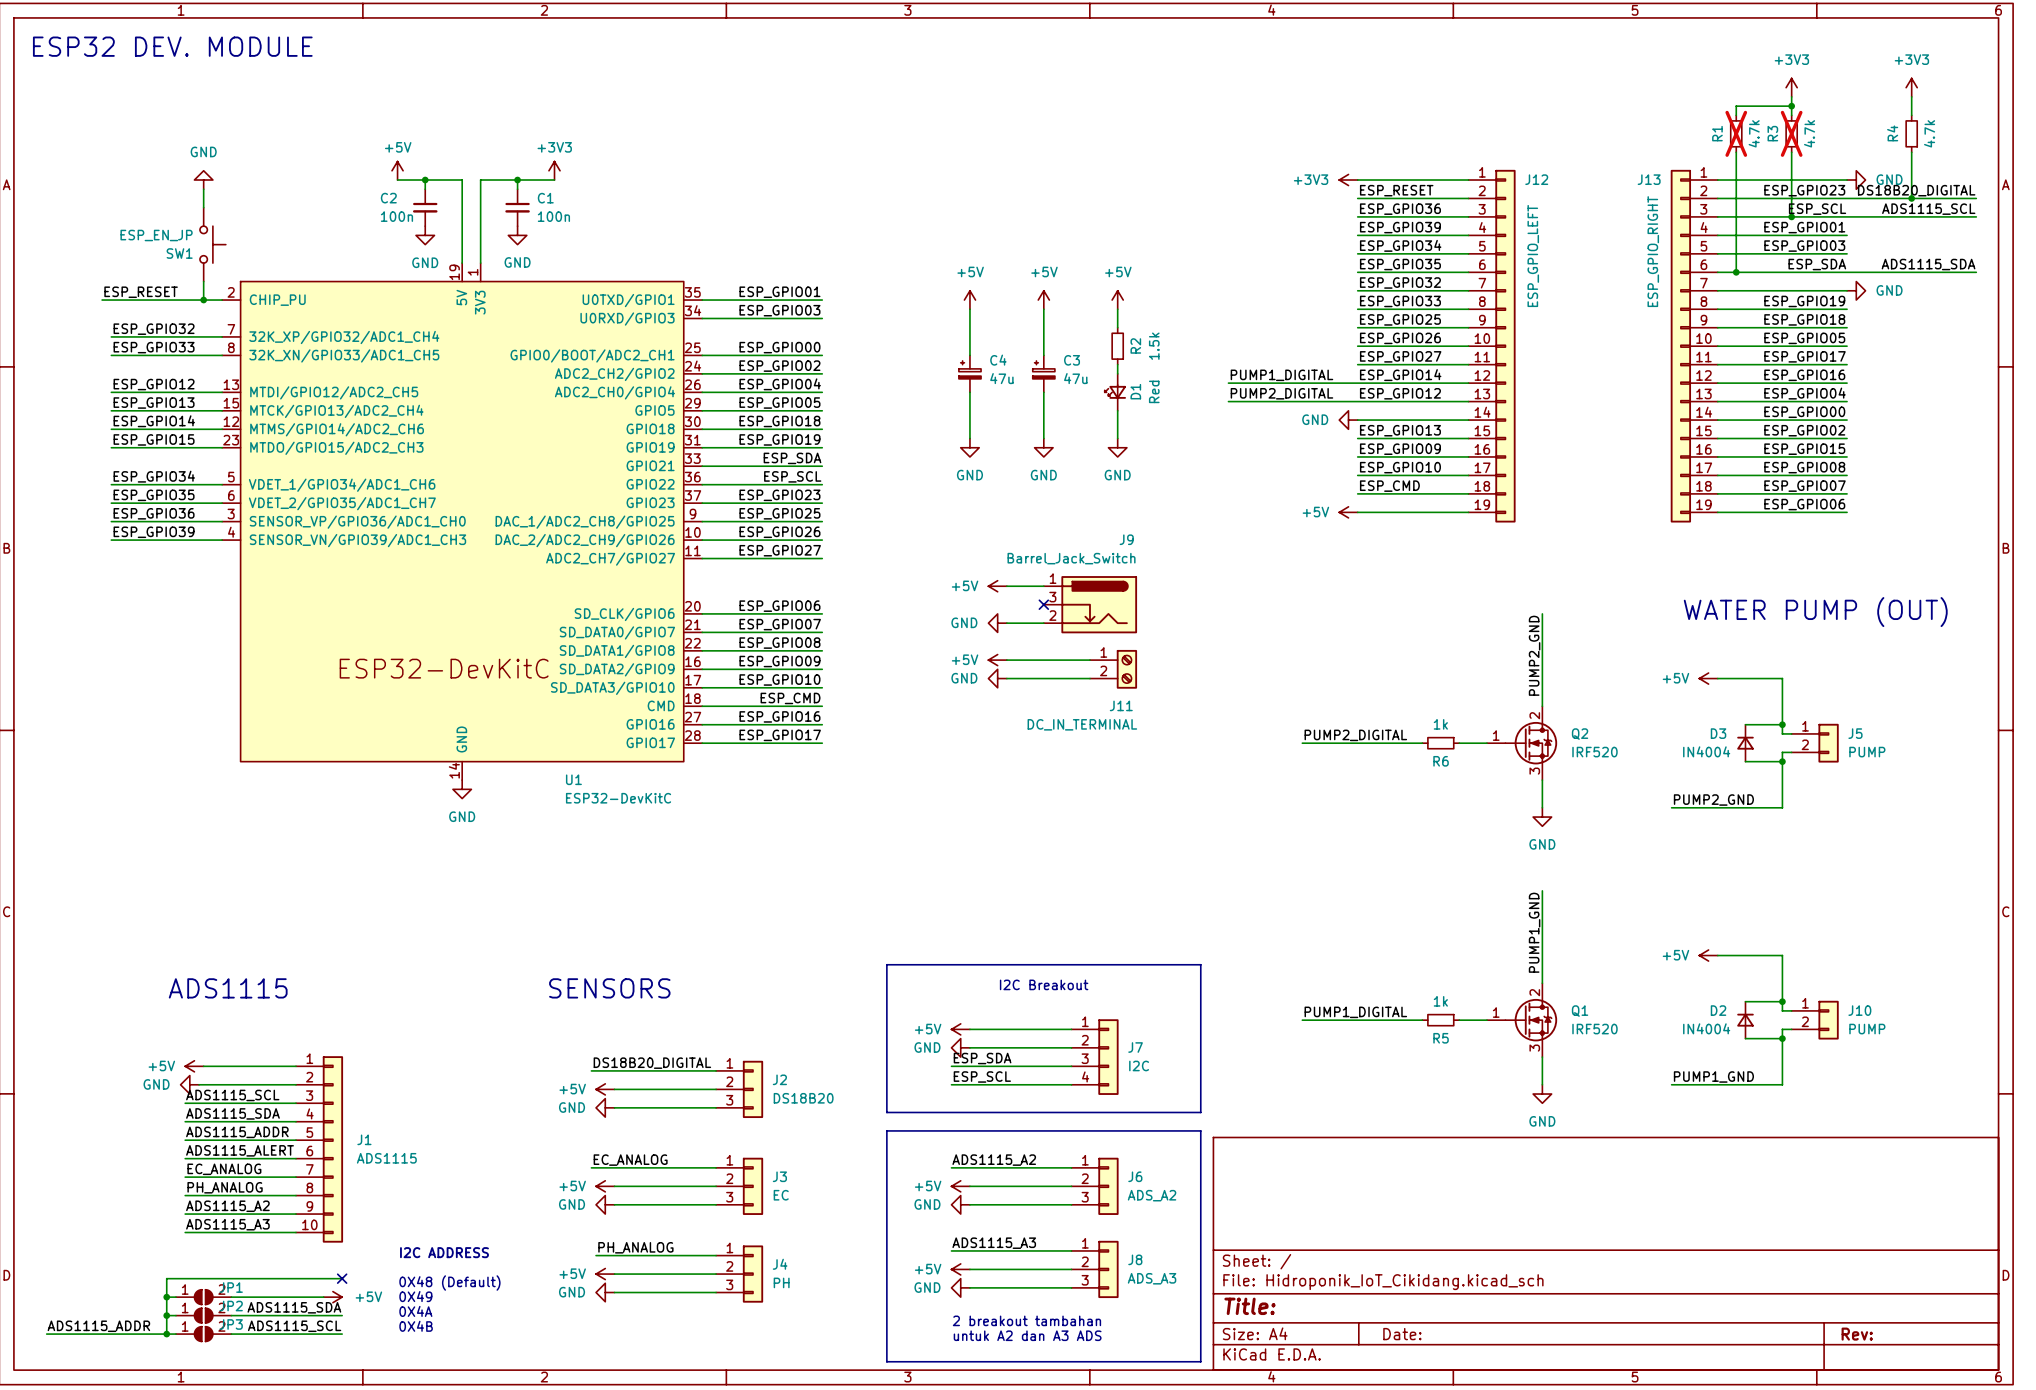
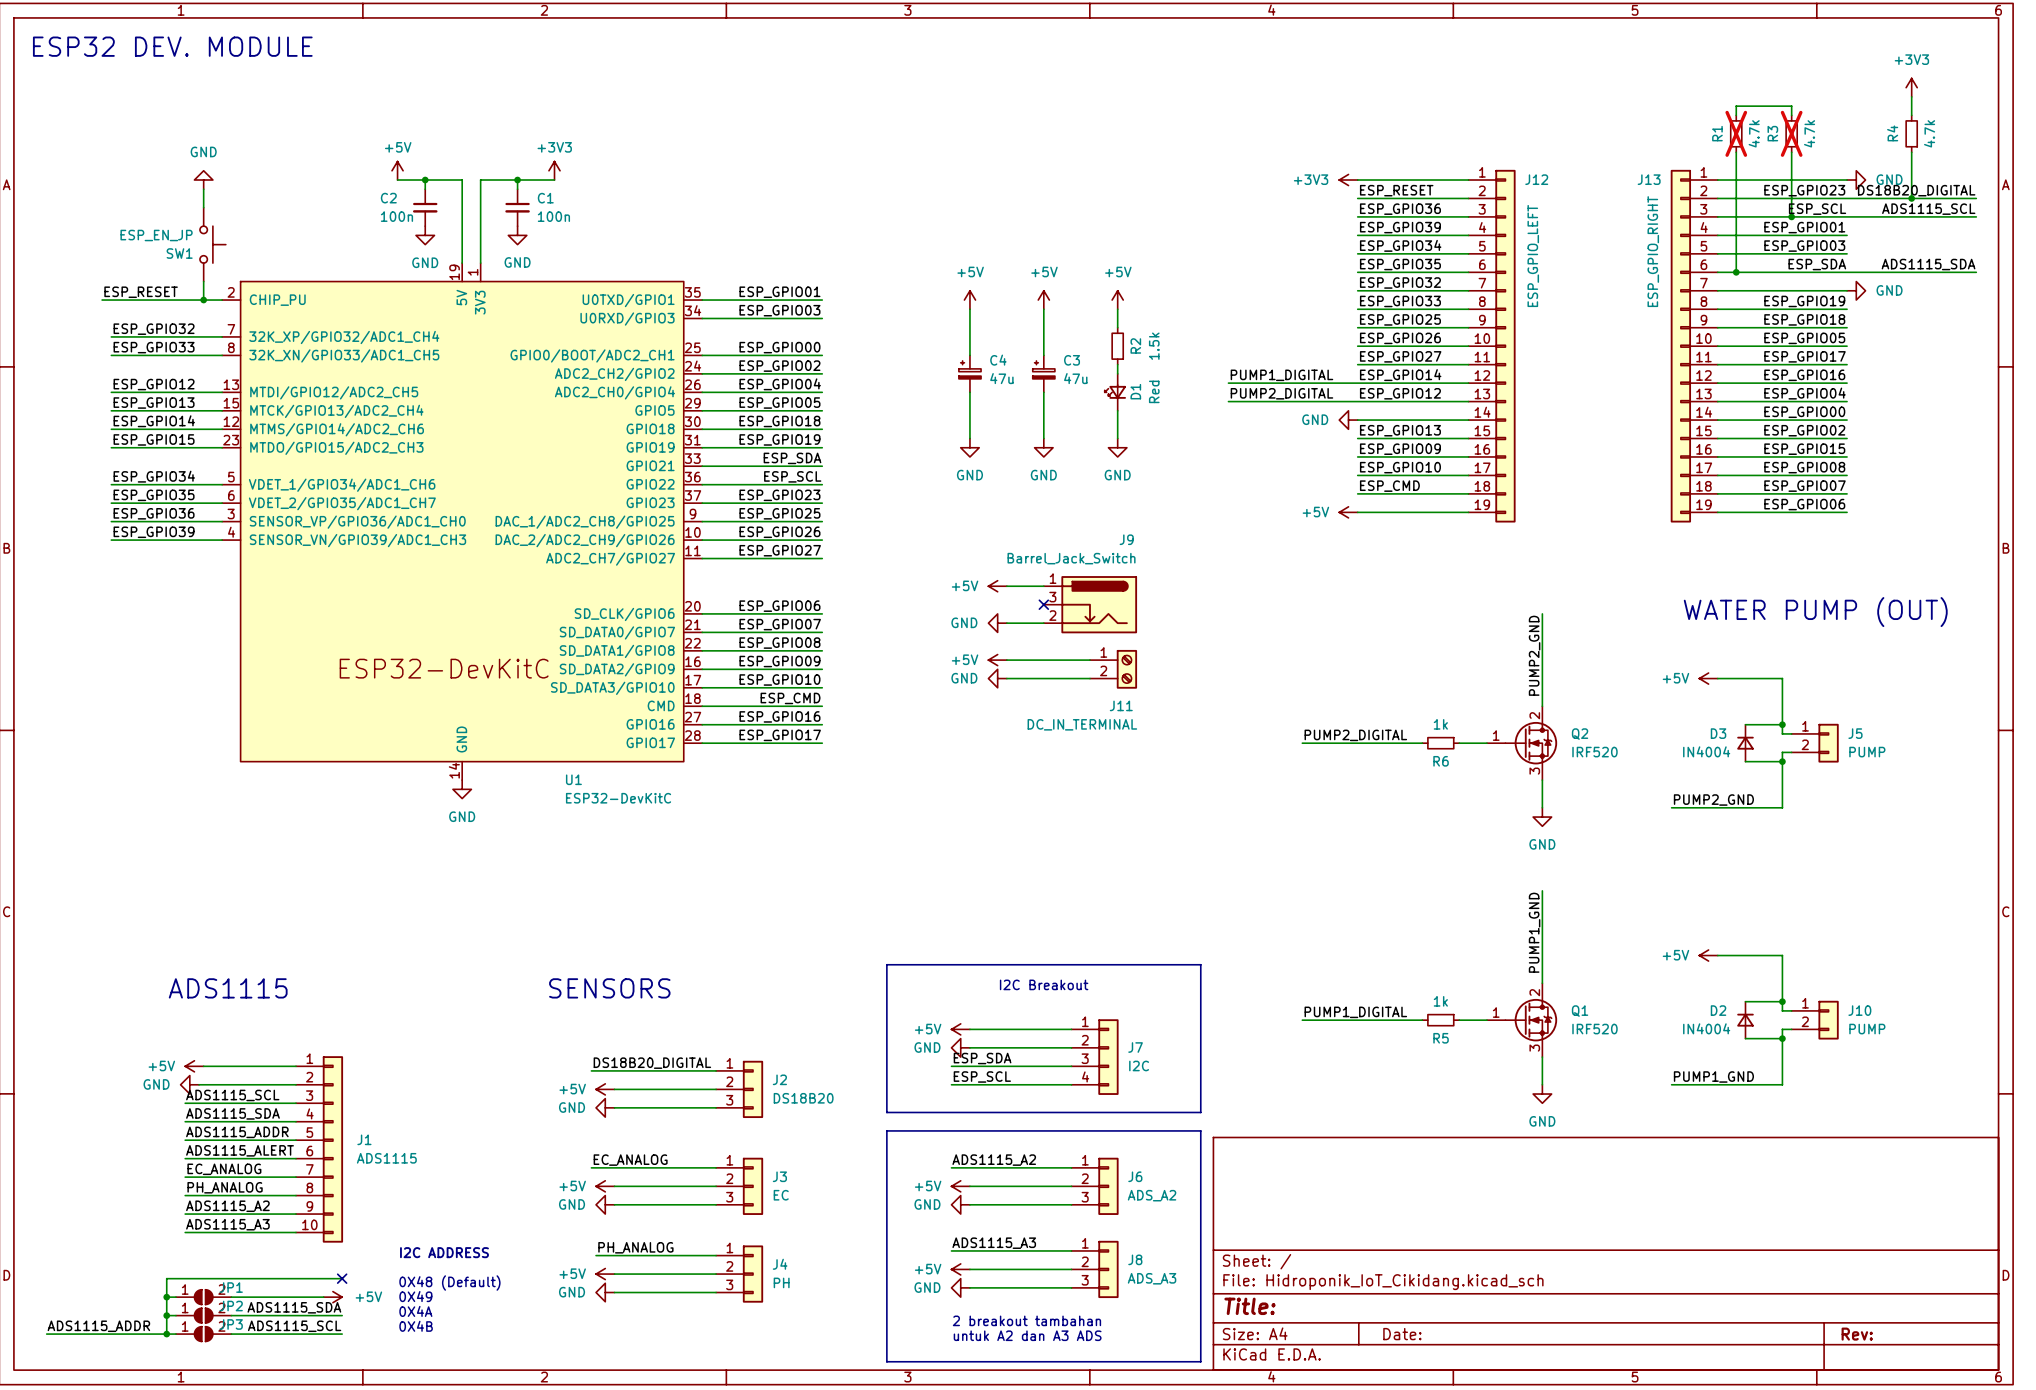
power symbol: +3V3 (1791, 87) -> none
wire: (1791, 96) (1791, 106) -> none
junction: (1791, 106) -> none

